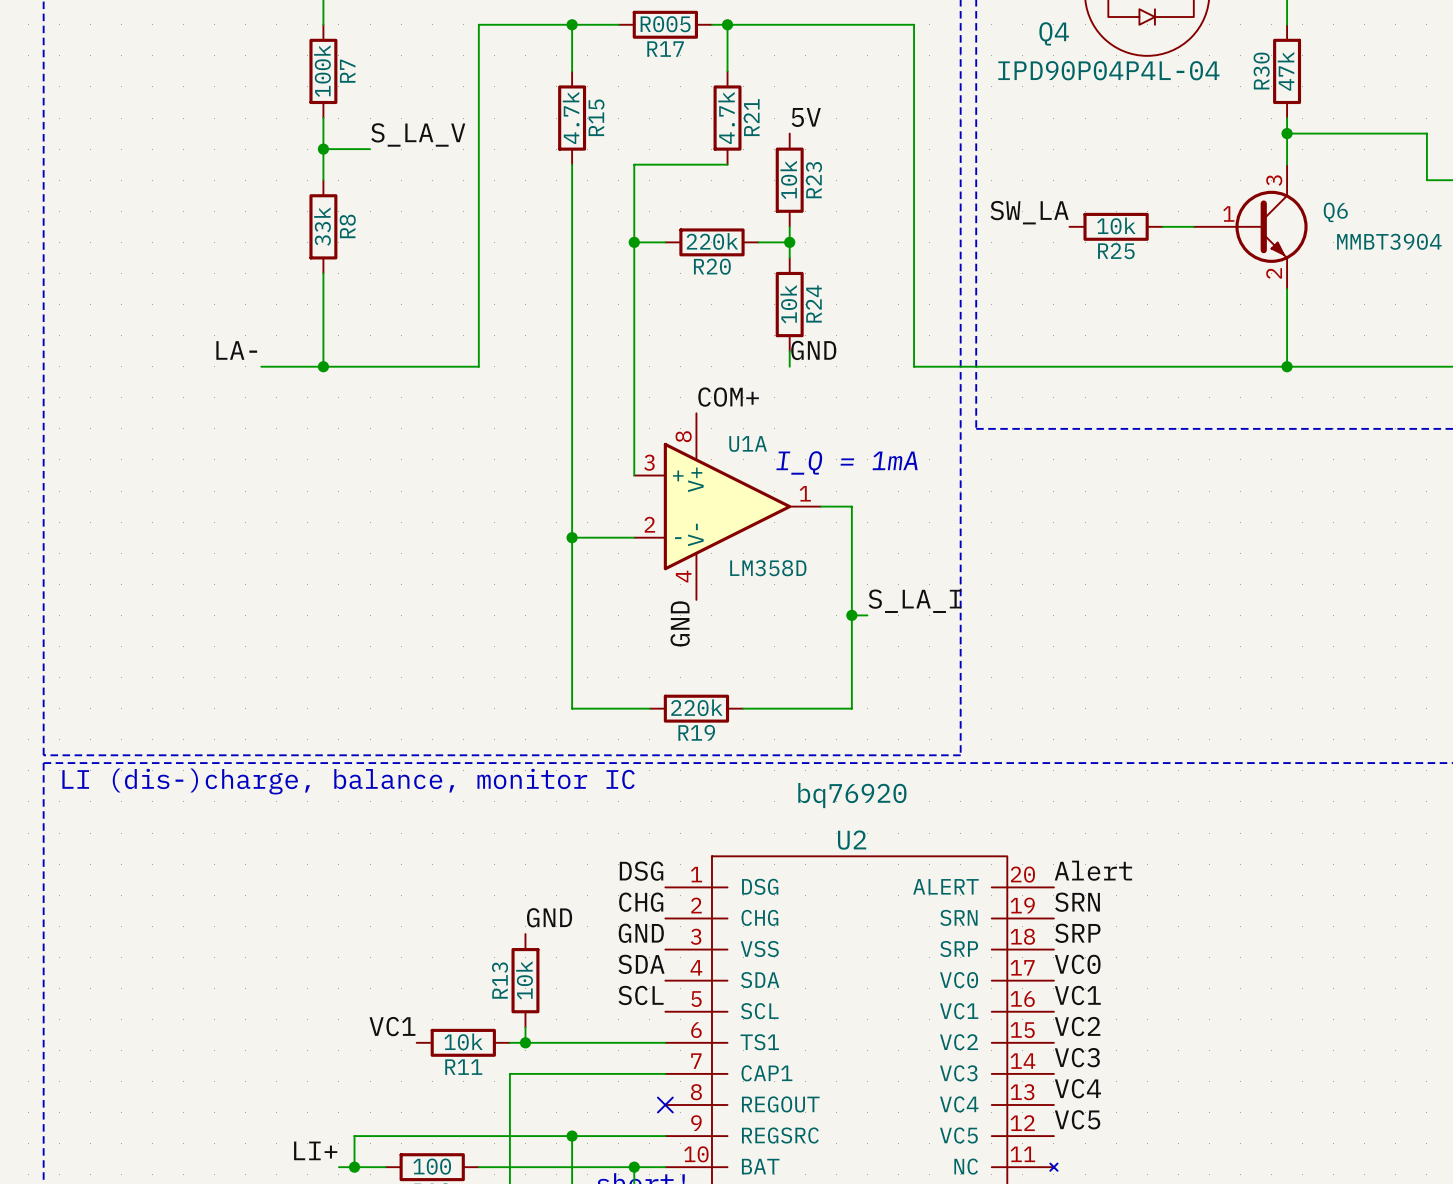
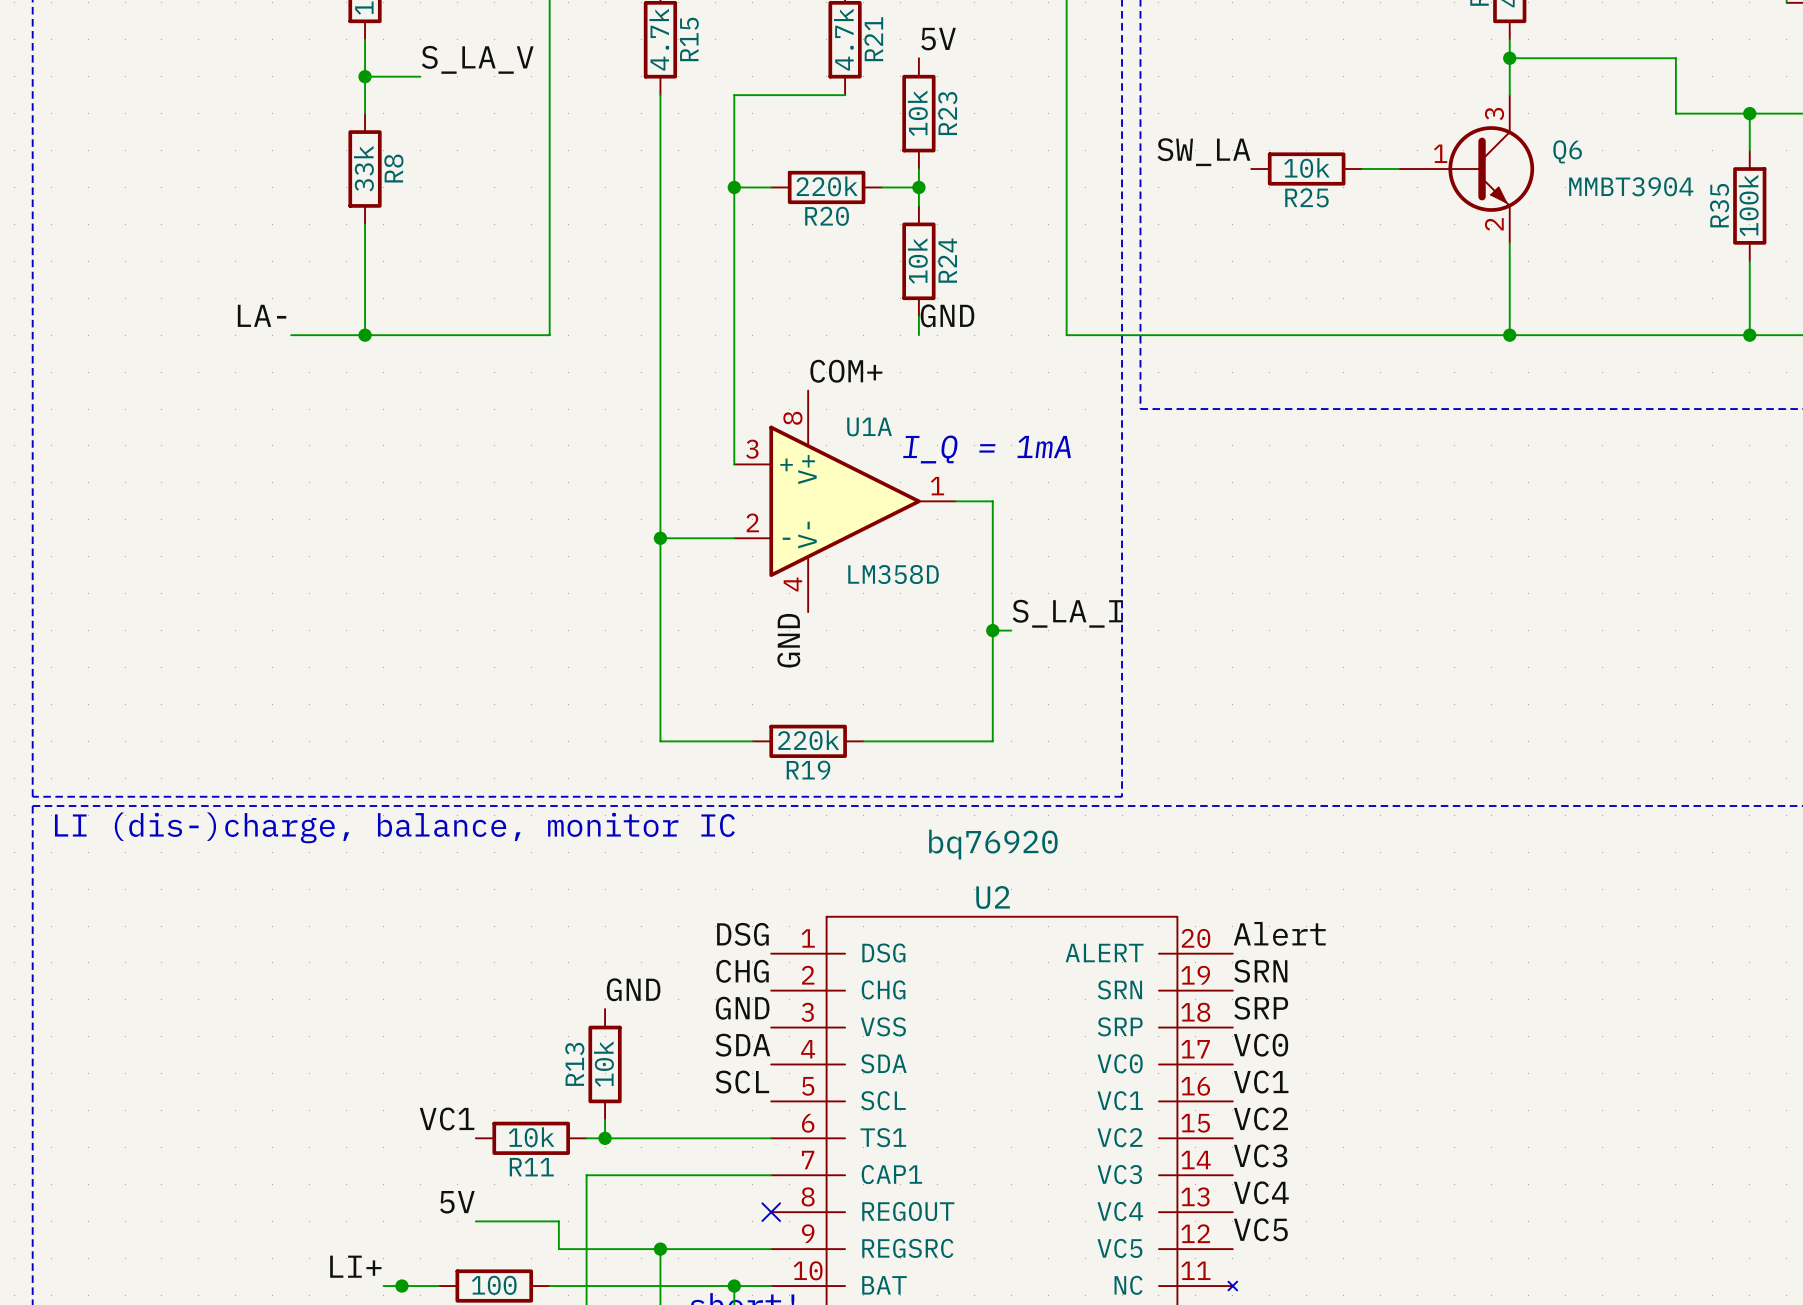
label: none -> 5V (457, 1202)
wire: (486, 1136) (354, 1136) (354, 1167) -> (558, 1249) (558, 1221) (475, 1221)

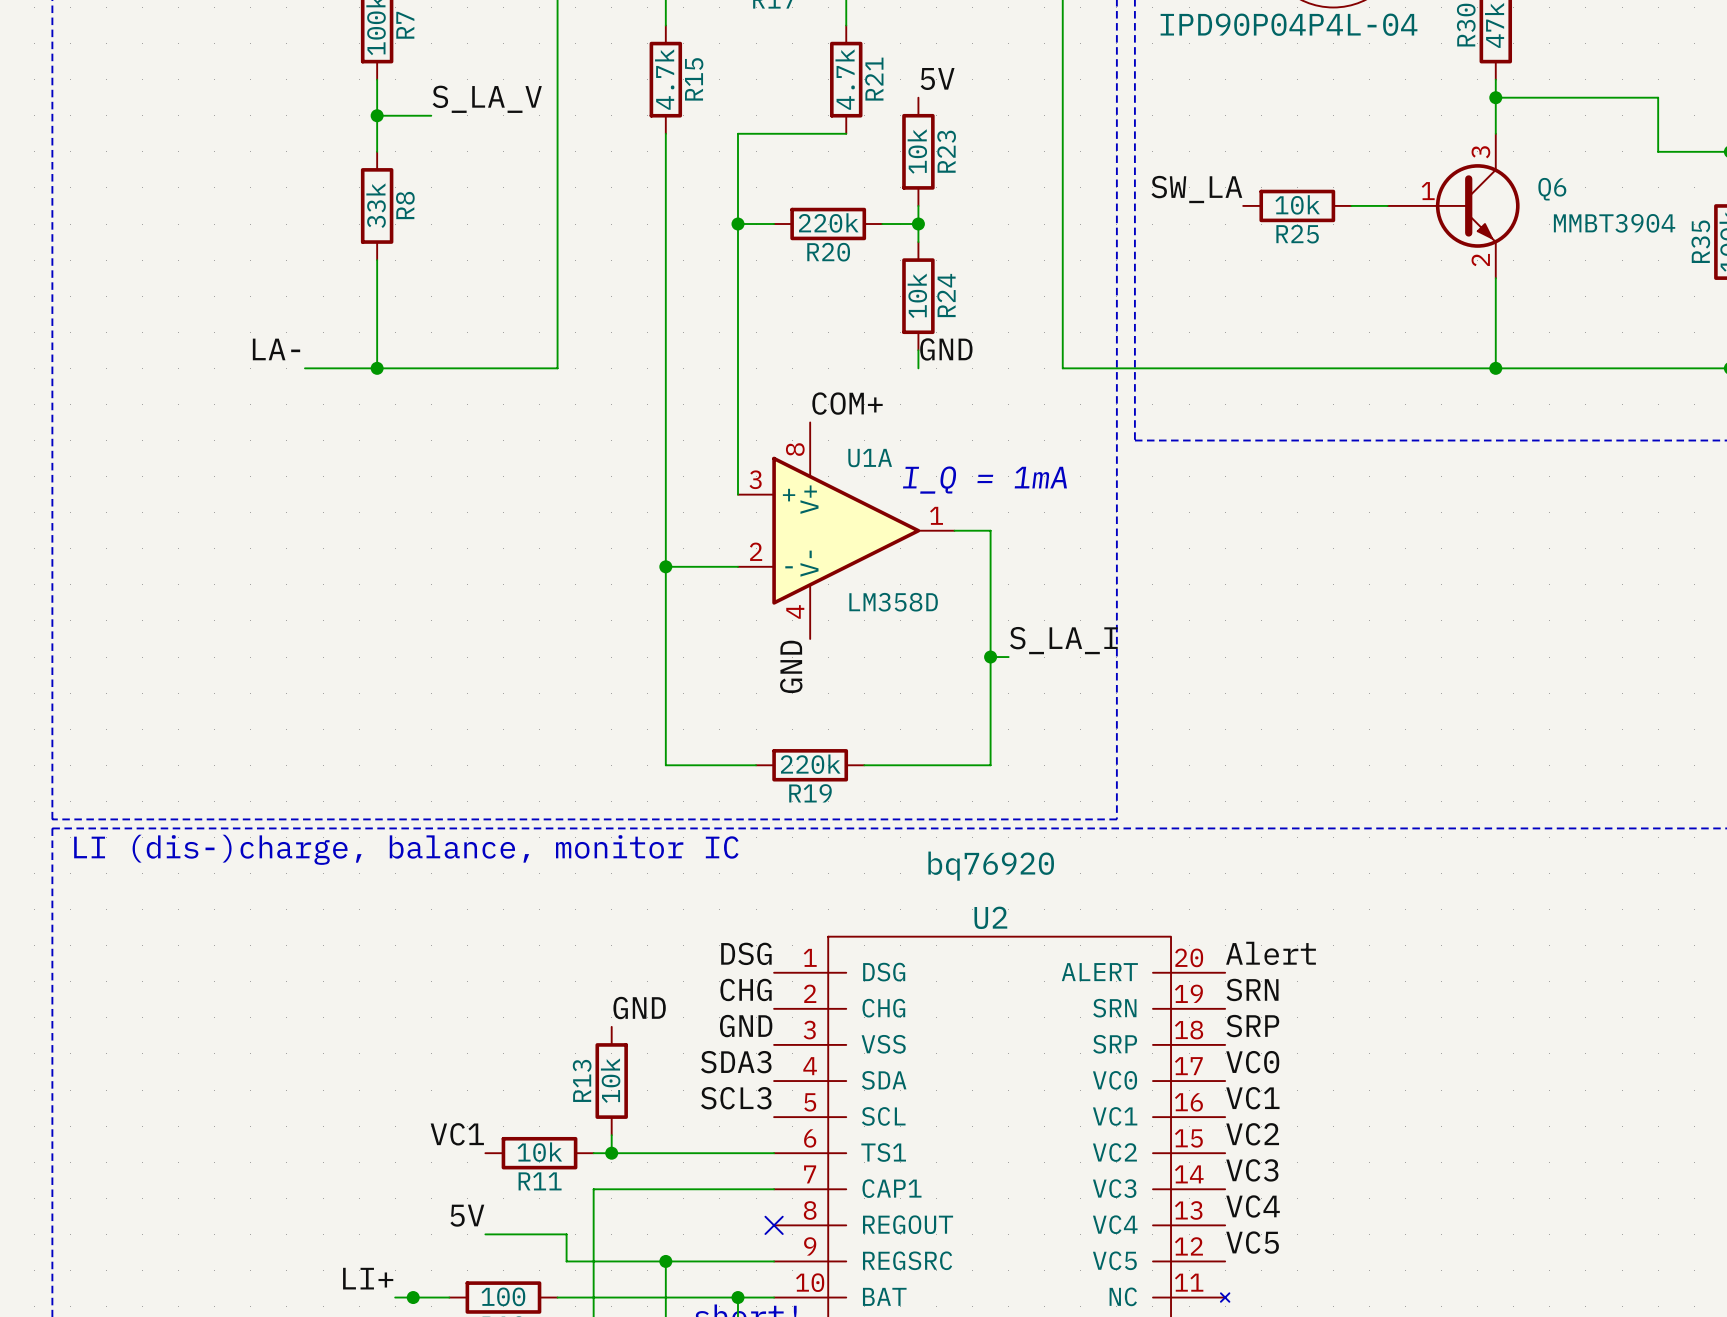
label: SDA (742, 1045) -> SDA3 (736, 1062)
label: SCL (742, 1082) -> SCL3 (736, 1098)

